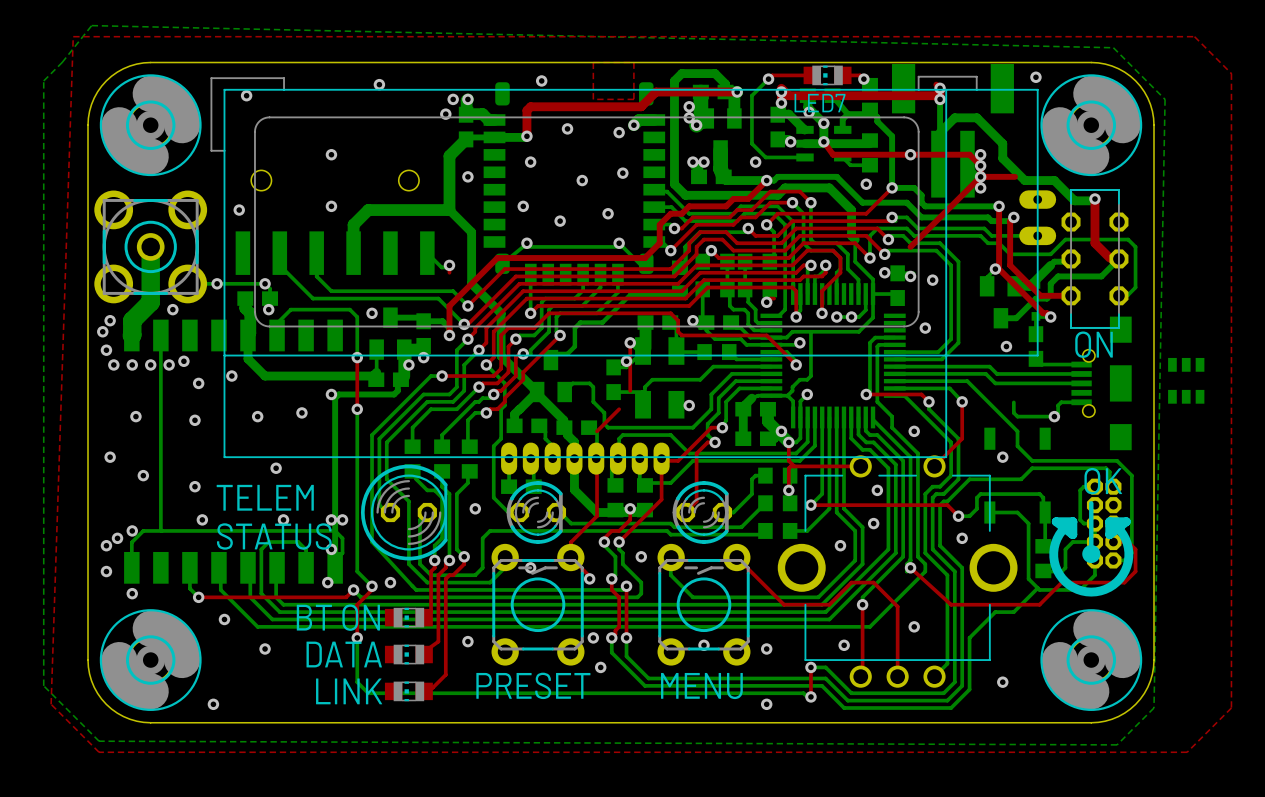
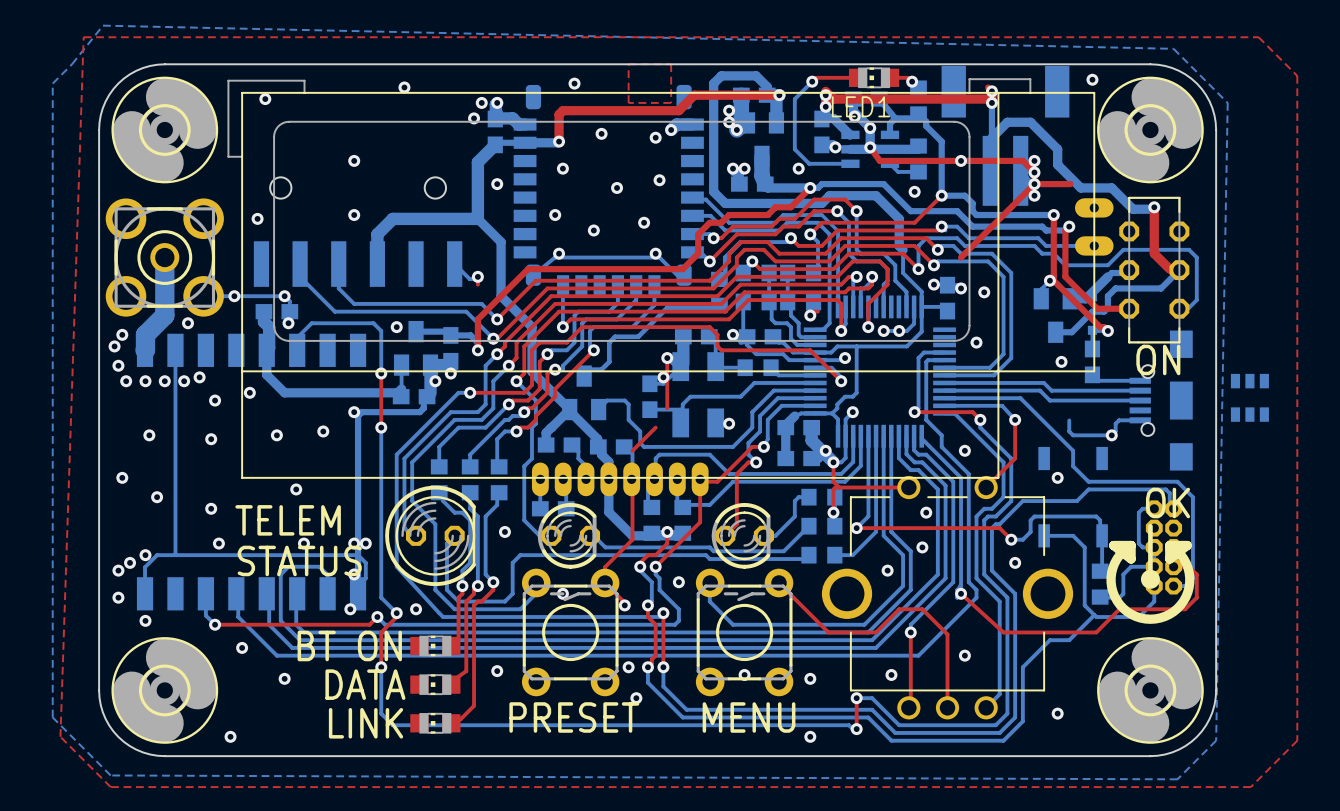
LED7 name: LED7 (820, 103) -> LED1 (860, 106)

